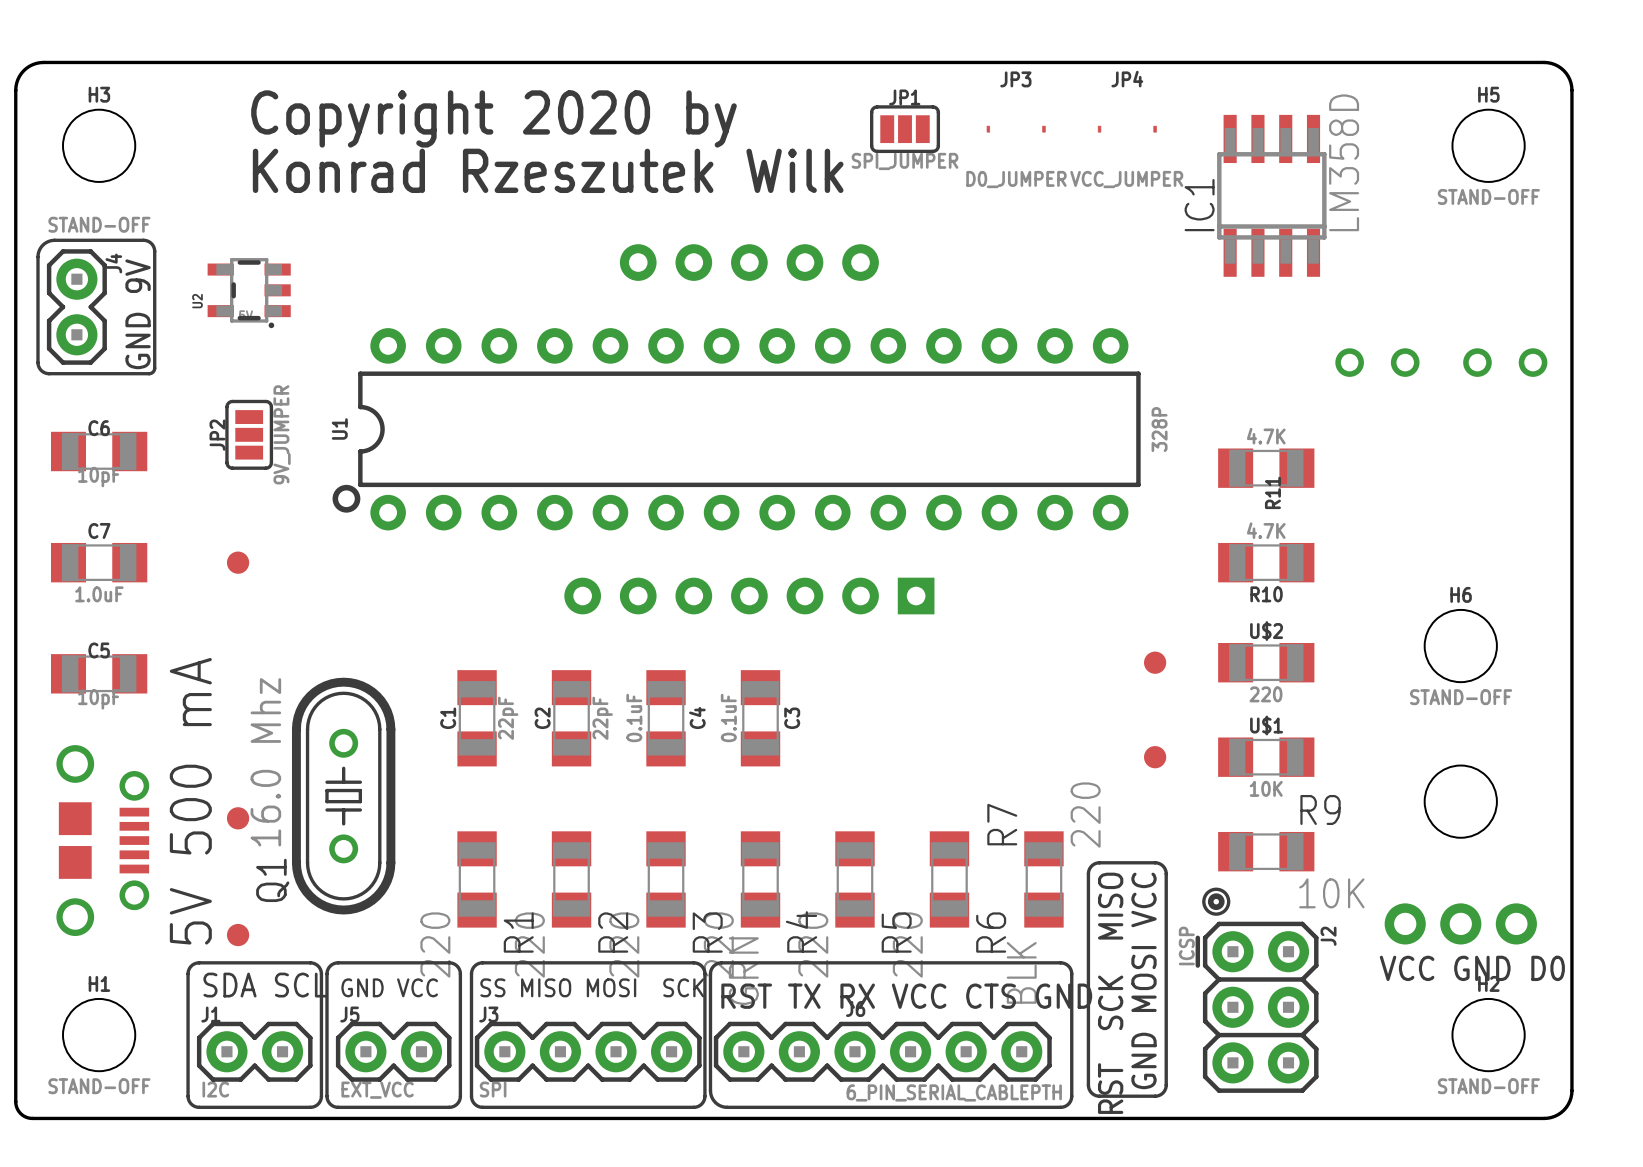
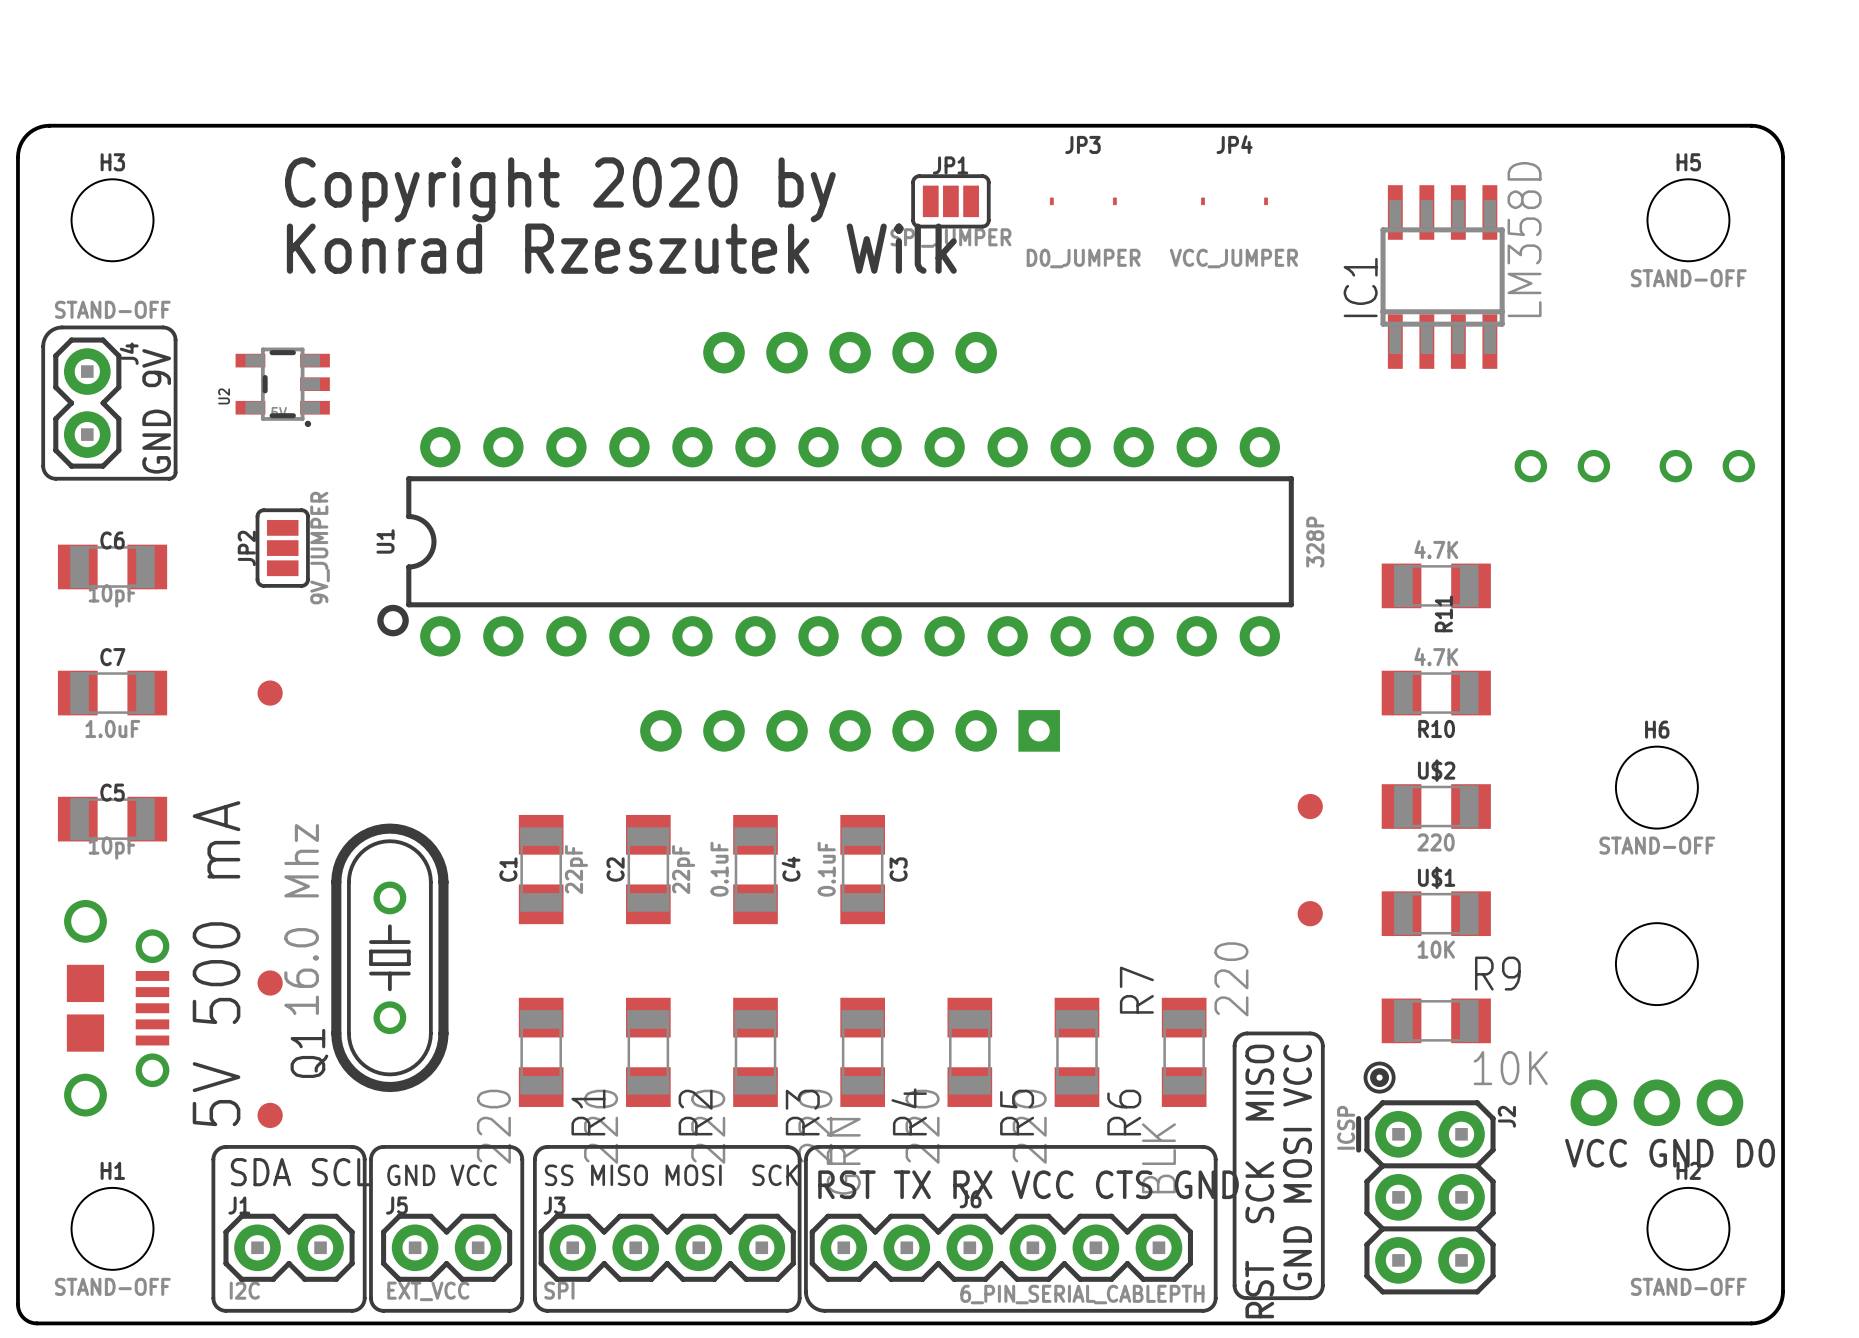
JP1 position: (905, 129) -> (950, 201)
JP3 position: (1016, 129) -> (1083, 201)
JP4 position: (1127, 129) -> (1234, 201)

